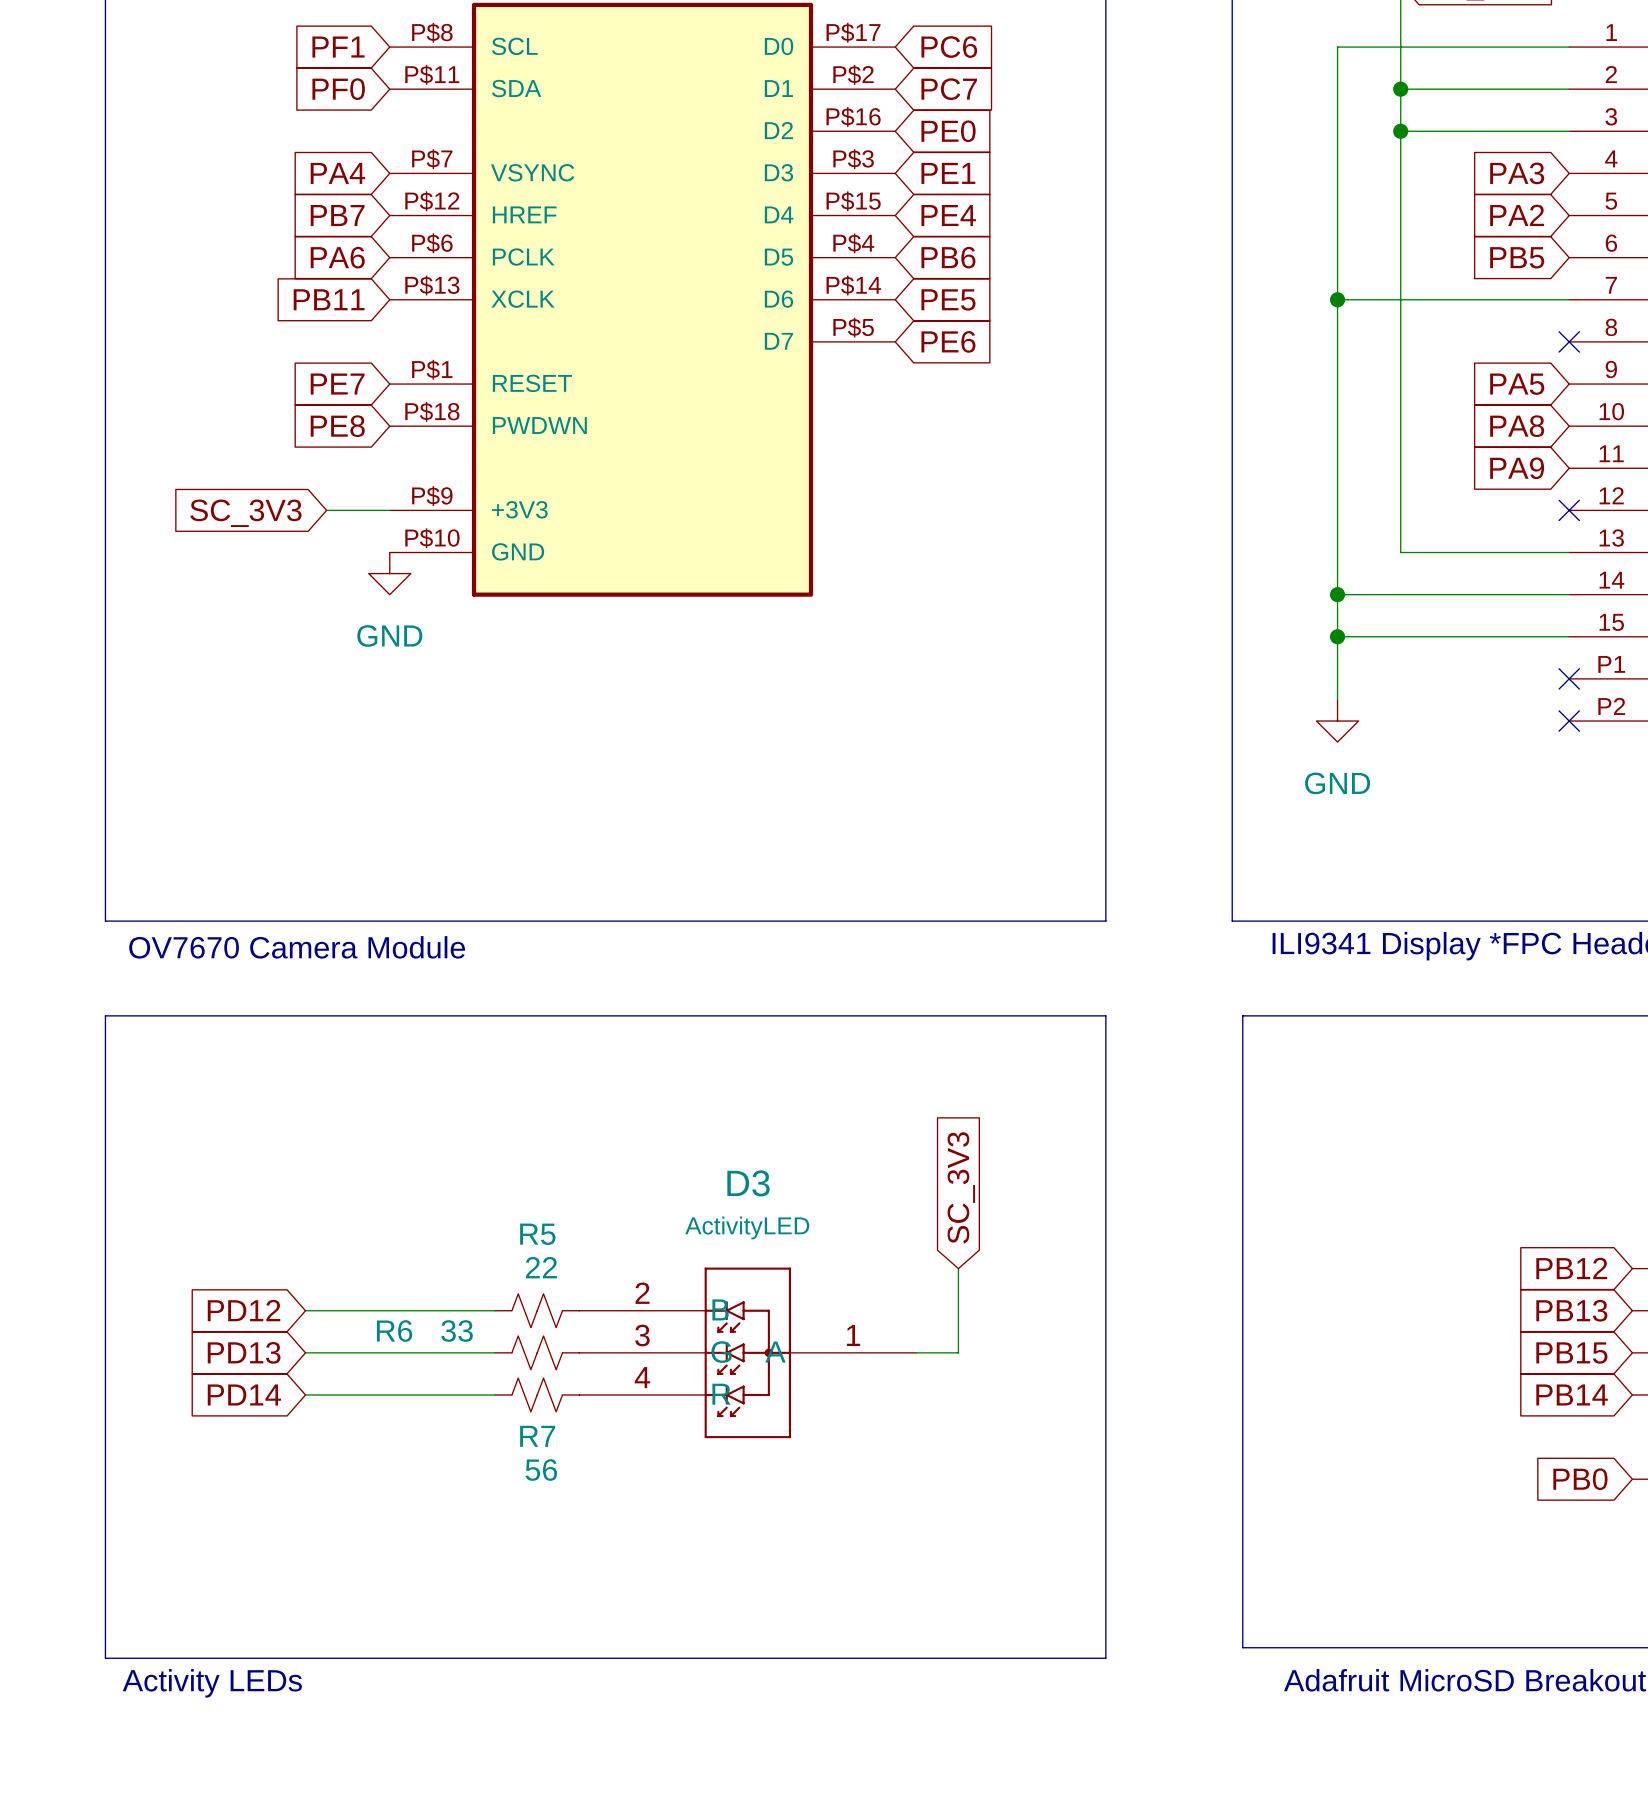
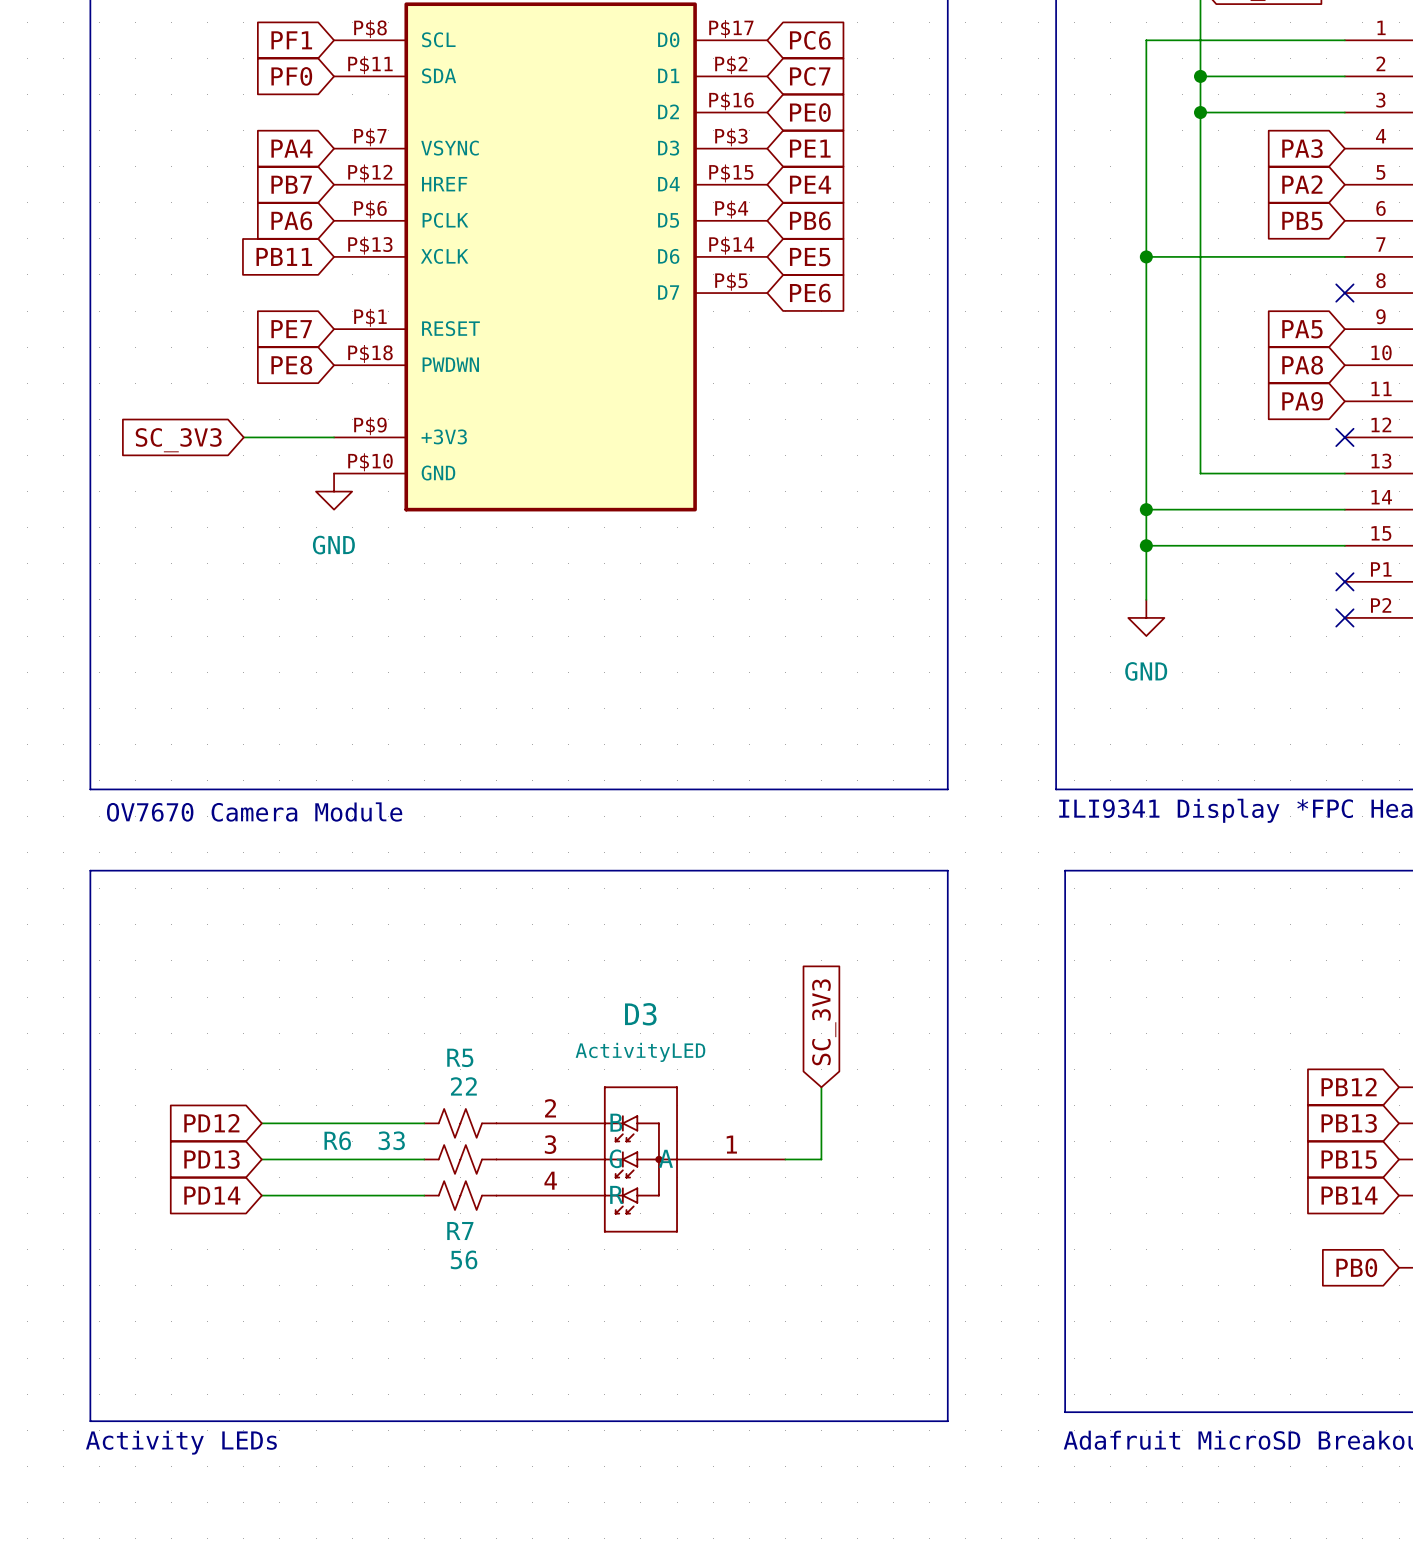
wire: none -> (243, 437) (279, 437)
global label position: SC_3V3 (245, 513) -> SC_3V3 (178, 440)

